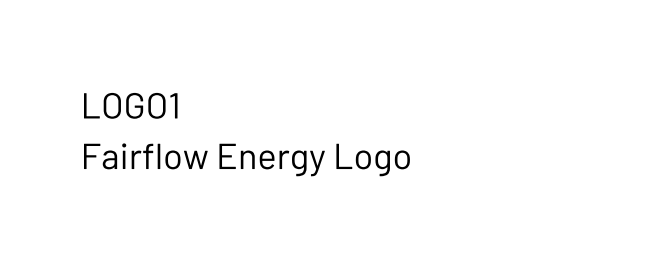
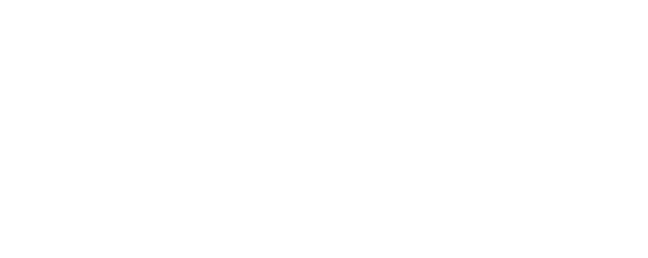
LOGO1: (246, 134) -> none

